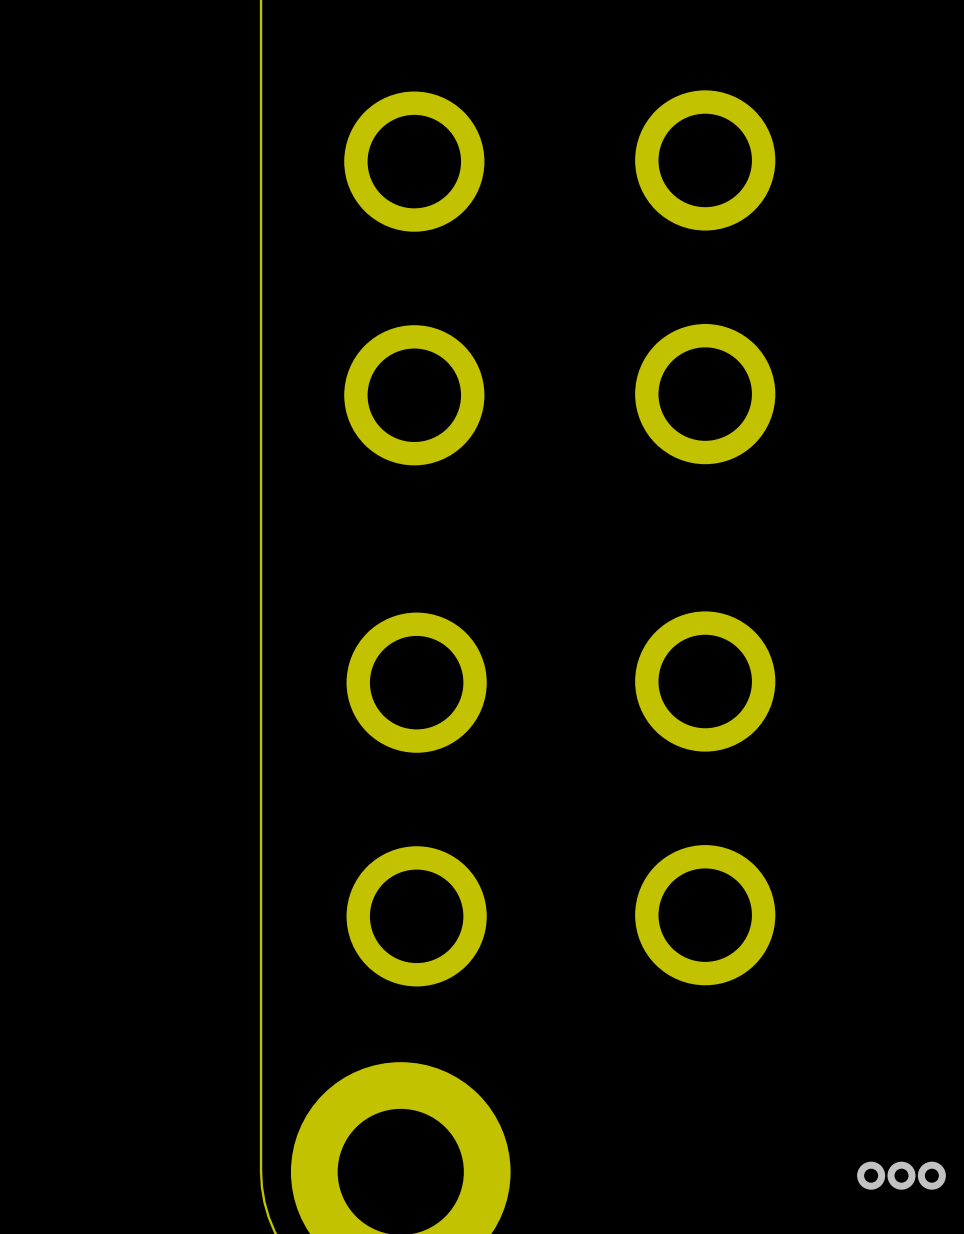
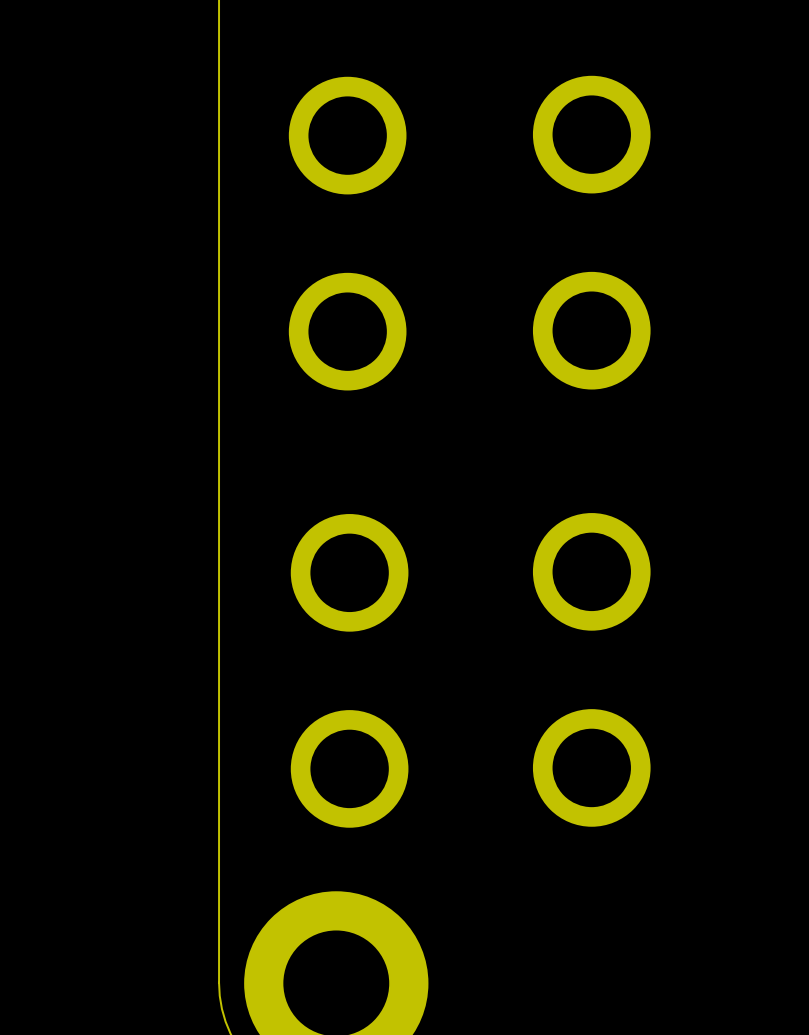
via: (871, 1175) -> none
via: (901, 1175) -> none
via: (931, 1175) -> none

